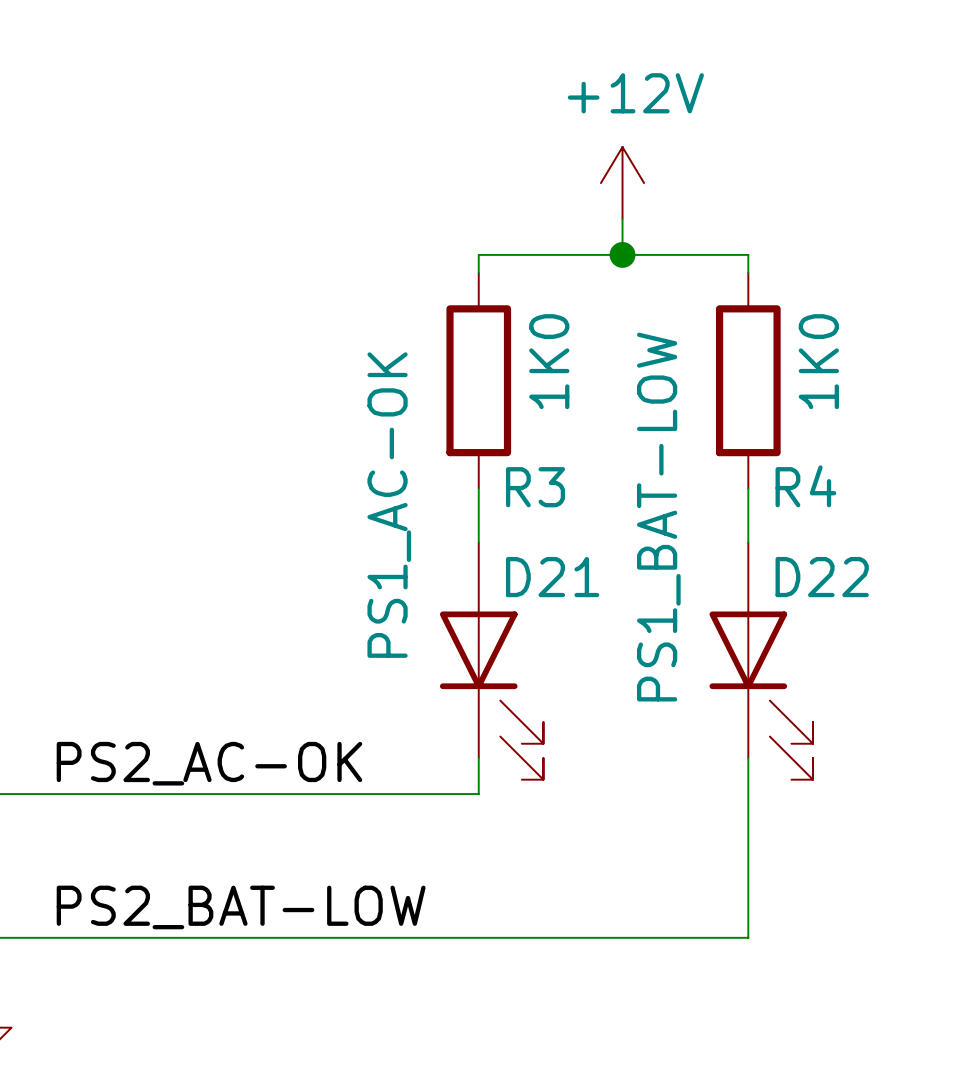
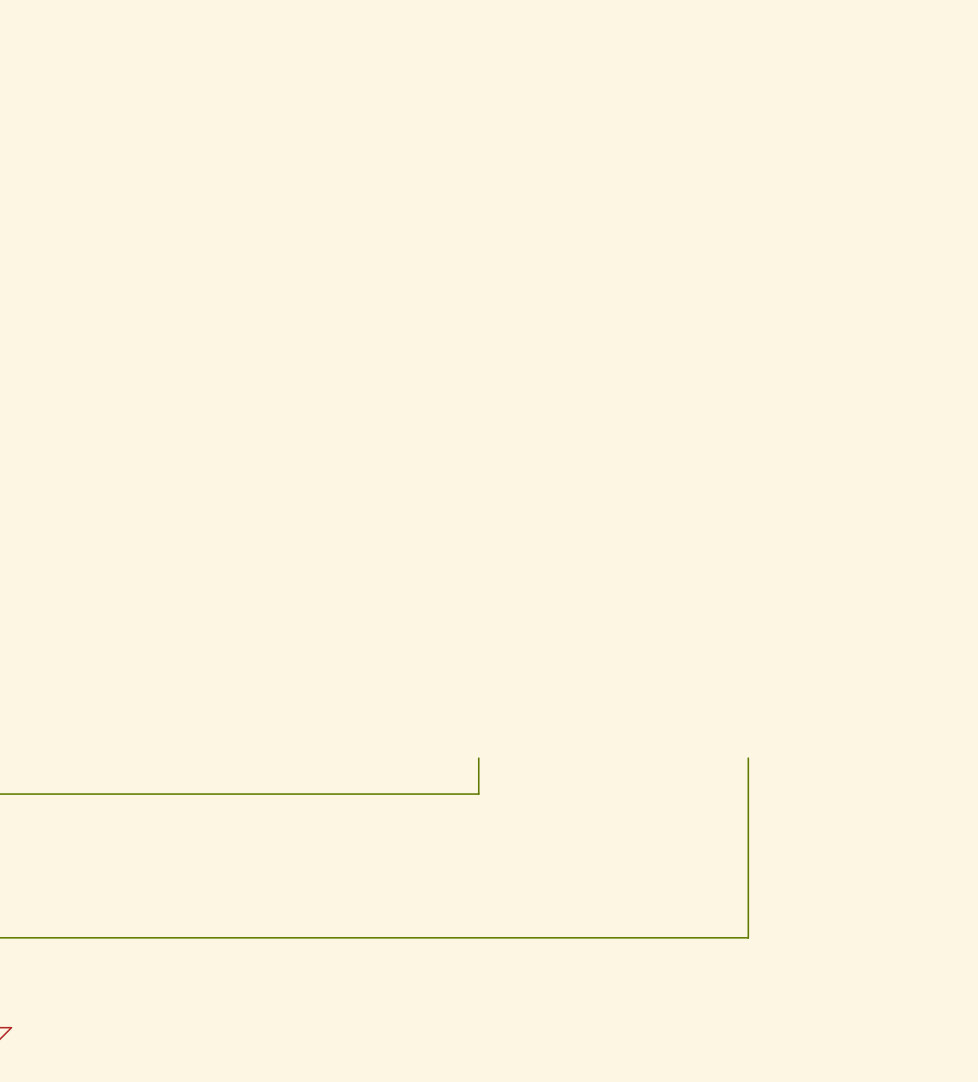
power symbol: +12V (622, 183) -> none
wire: (622, 218) (622, 254) -> none
junction: (622, 254) -> none
wire: (478, 272) (478, 254) (748, 254) (748, 272) -> none
R3: 1K0 (478, 380) -> none
R4: 1K0 (748, 380) -> none
wire: (478, 488) (478, 542) -> none
wire: (748, 488) (748, 542) -> none
D21: PS1_AC-OK (491, 661) -> none
D22: PS1_BAT-LOW (761, 661) -> none
label: PS2_AC-OK (209, 763) -> none
label: PS2_BAT-LOW (241, 907) -> none

